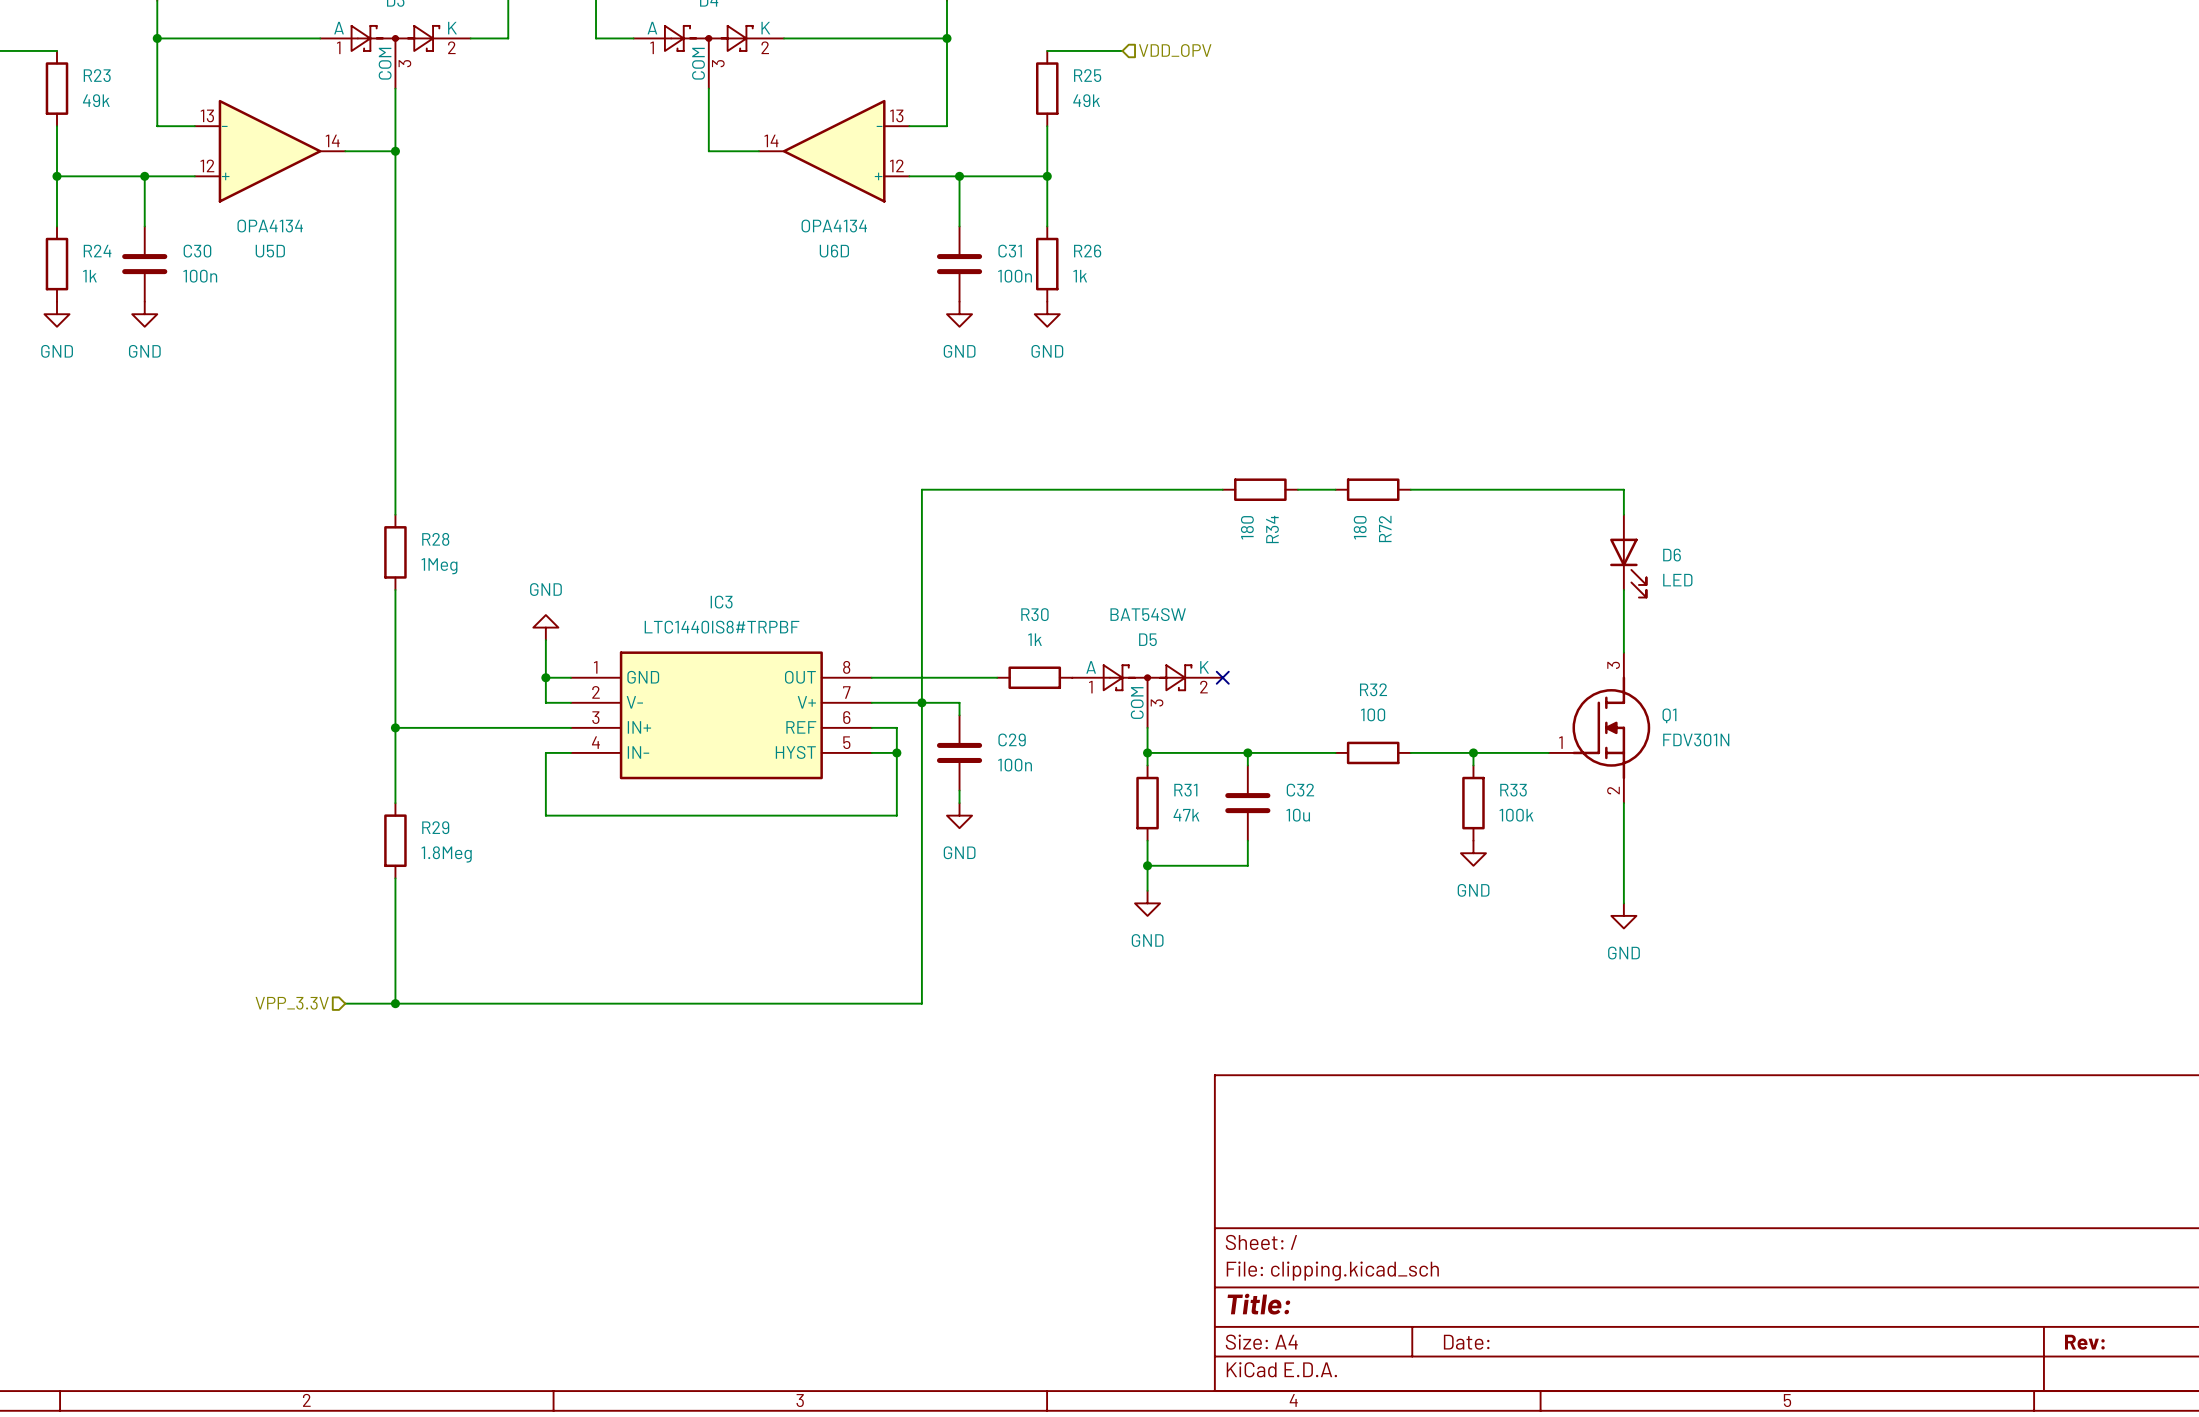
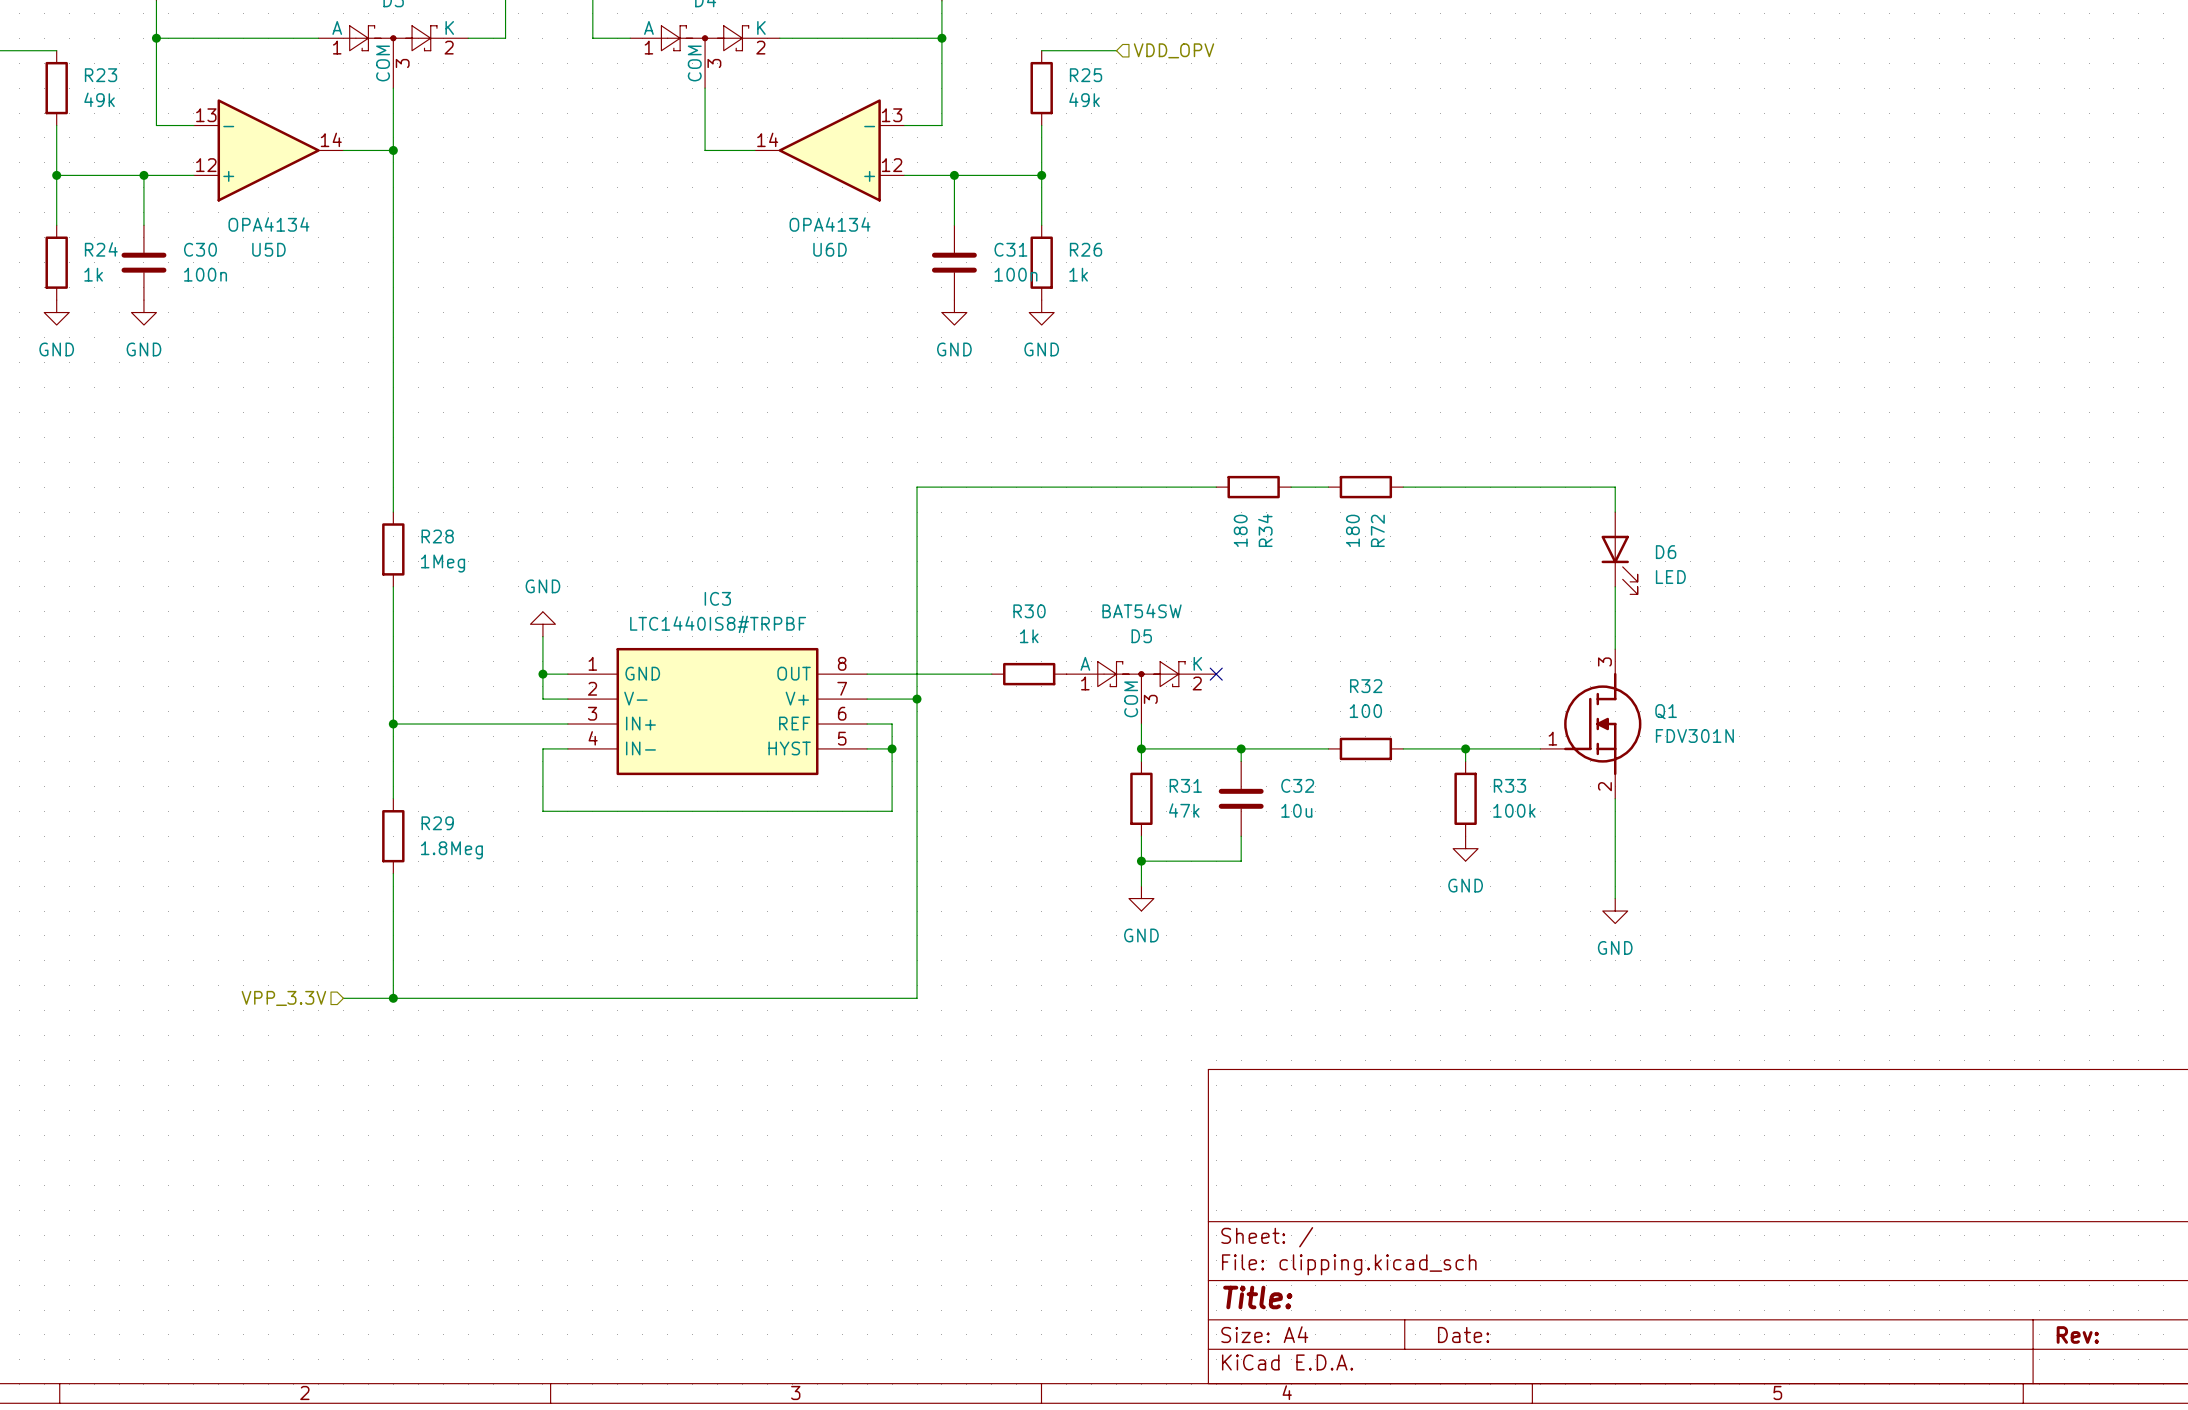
wire: (921, 702) (959, 702) (959, 715) -> none
C29: 100n (959, 752) -> none
wire: (959, 790) (959, 803) -> none
power symbol: GND (959, 815) -> none

